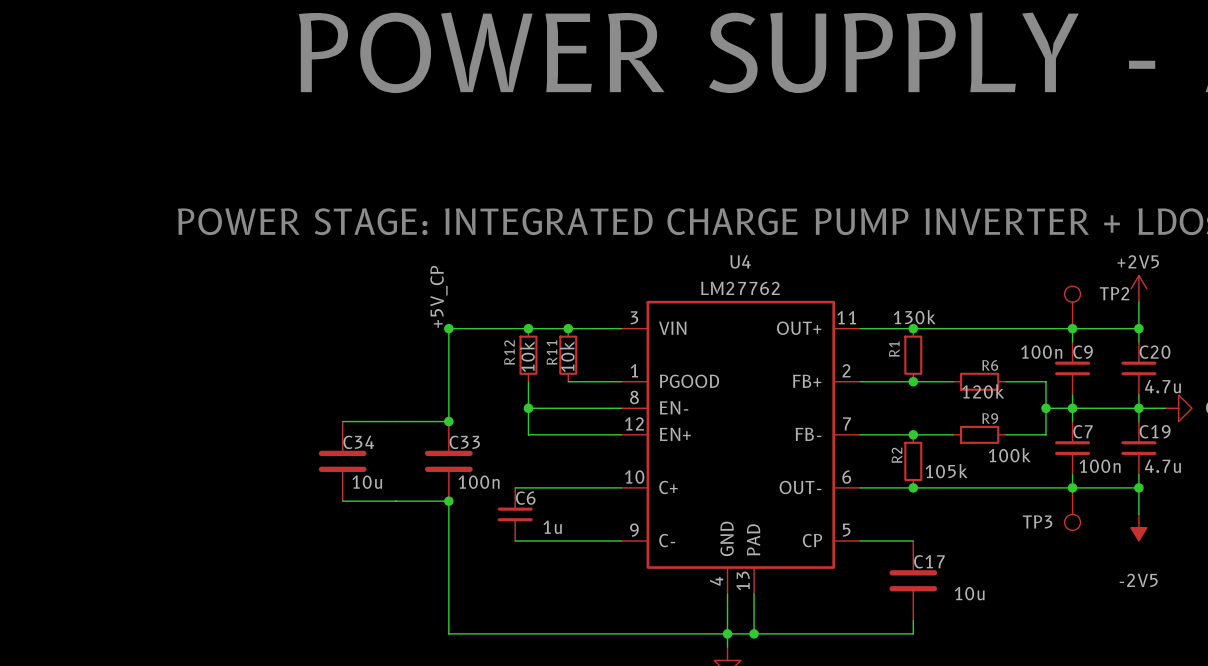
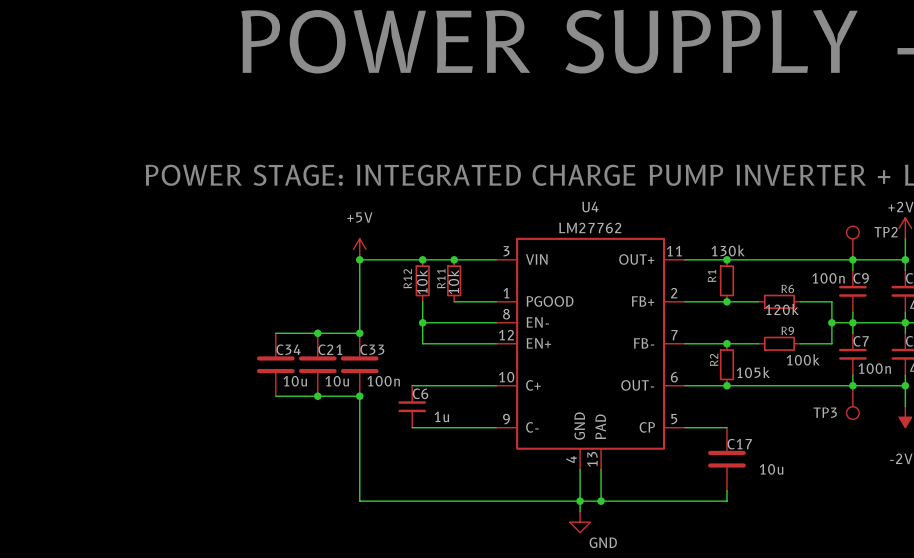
label: +5V_CP (438, 296) -> none
power symbol: none -> +5V (359, 249)
junction: none -> (317, 333)
C21: none -> 10u (317, 364)
junction: none -> (317, 396)

